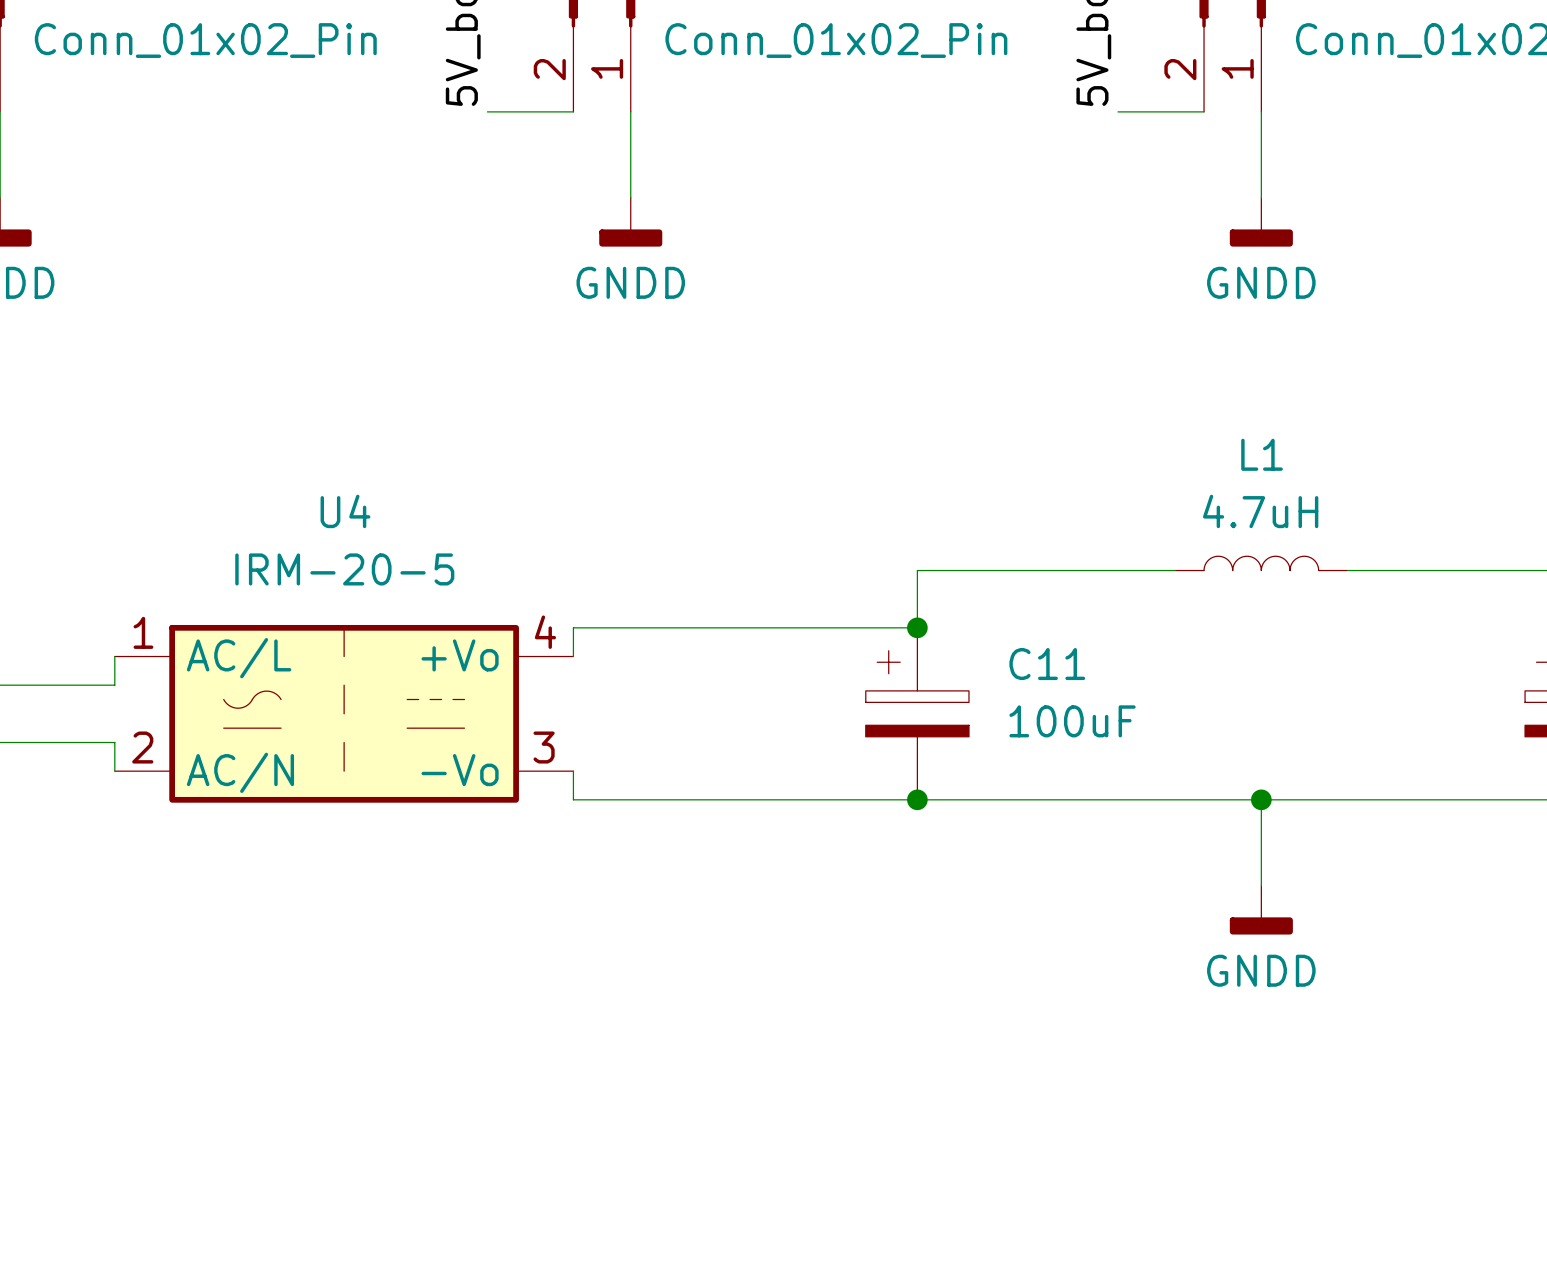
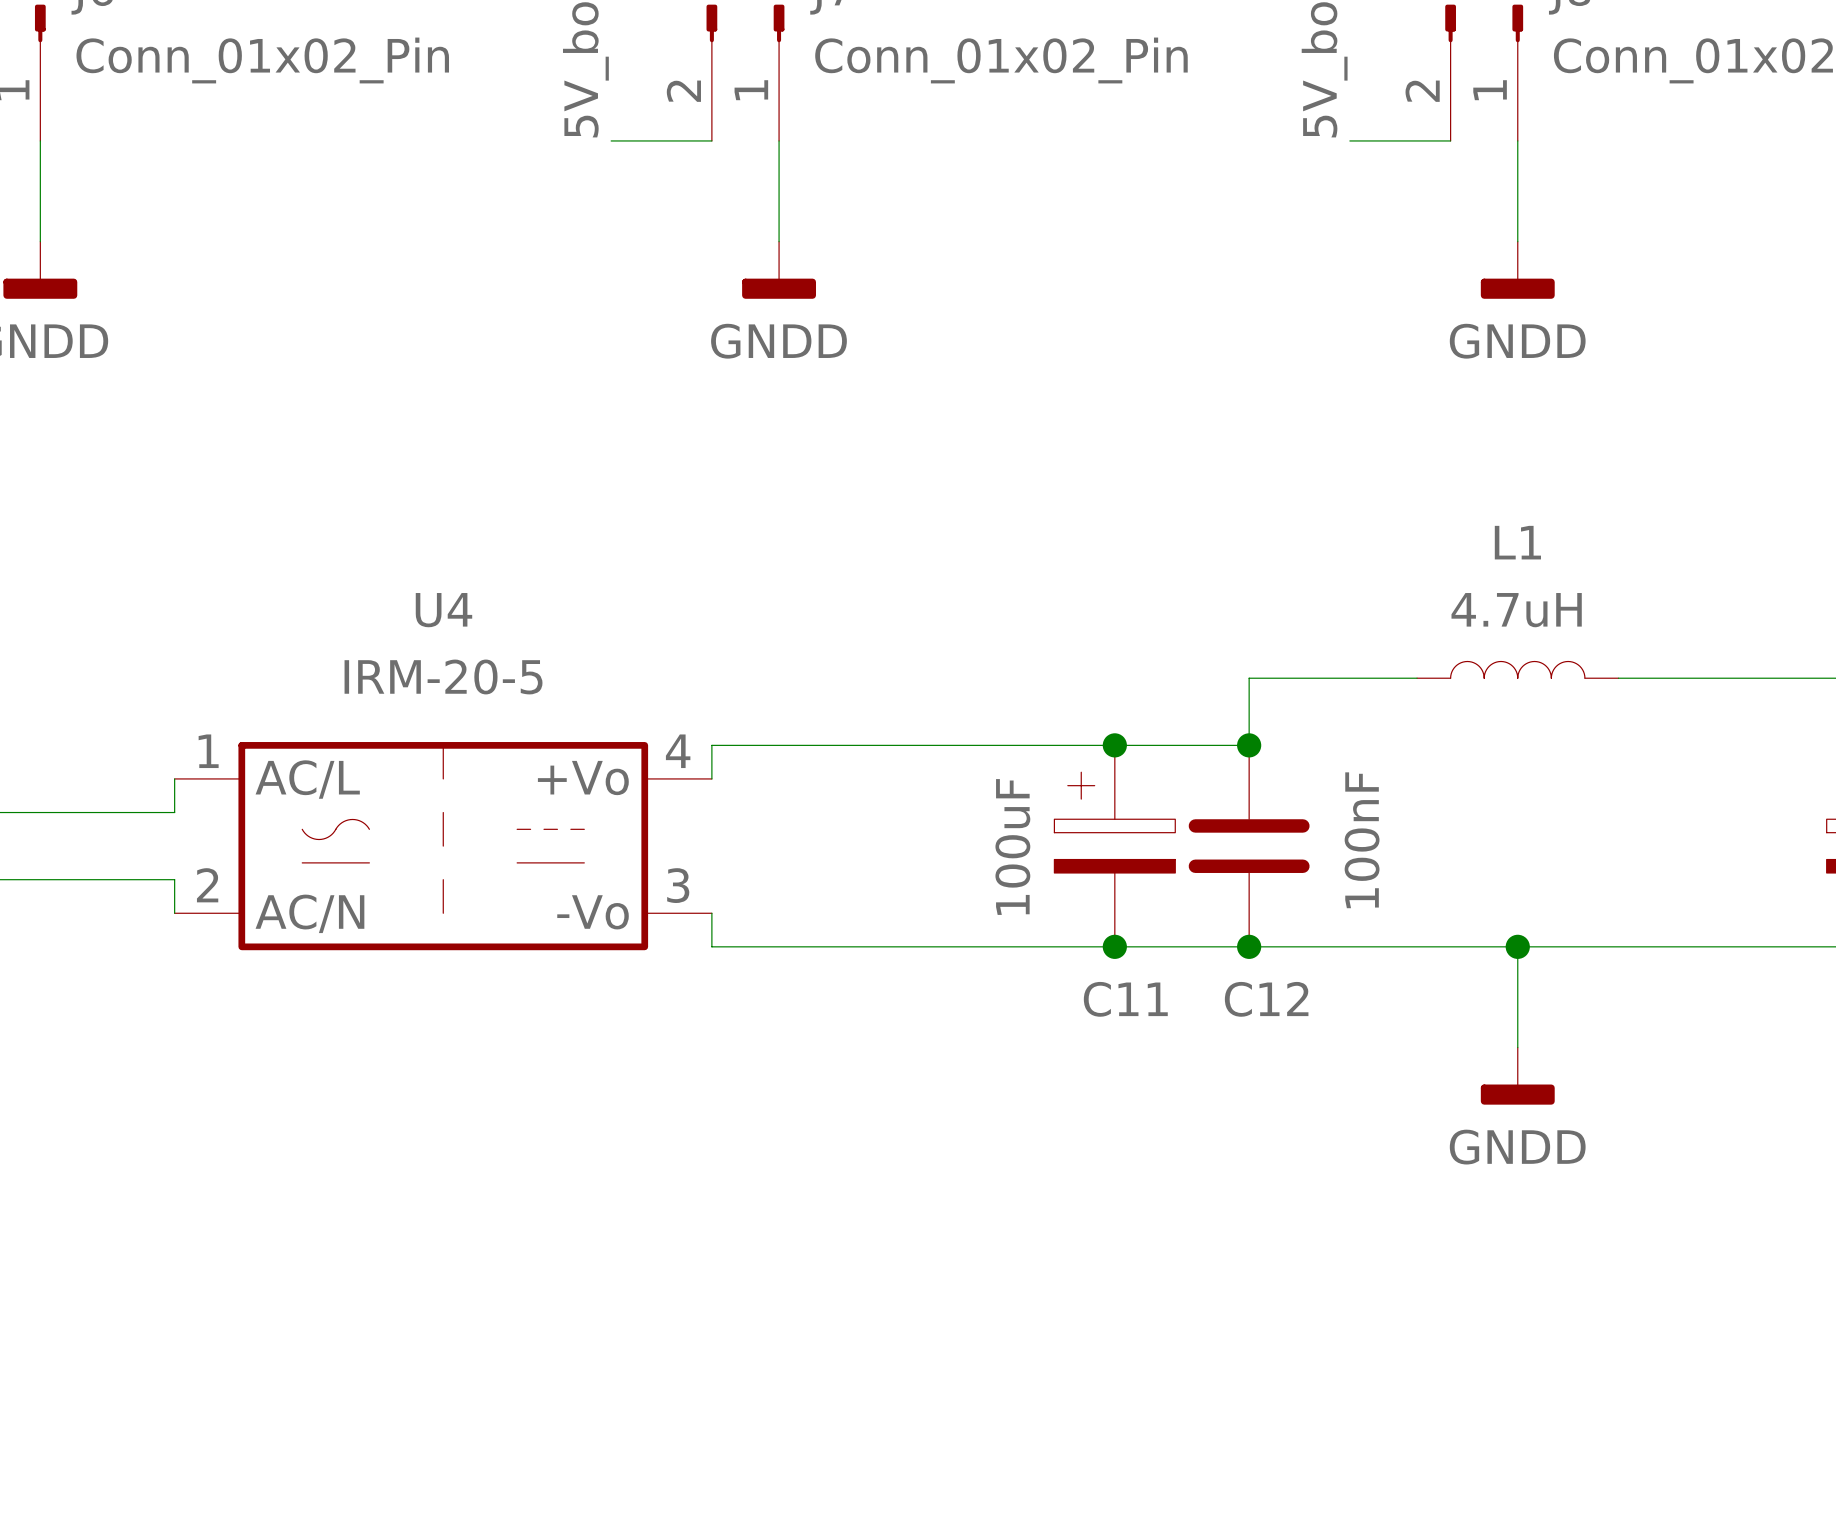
wire: (1032, 570) (917, 570) (917, 627) -> (1249, 678) (1249, 745) (1114, 745)
junction: none -> (1249, 745)
C11 name position: C11 (1047, 664) -> C11 (1125, 999)
C12: none -> 100nF (1249, 846)
C11 value rotation: 0° (1072, 721) -> 90° counterclockwise (1012, 846)
C11 value position: 100uF (1072, 721) -> 100uF (1012, 846)
junction: none -> (1249, 946)

